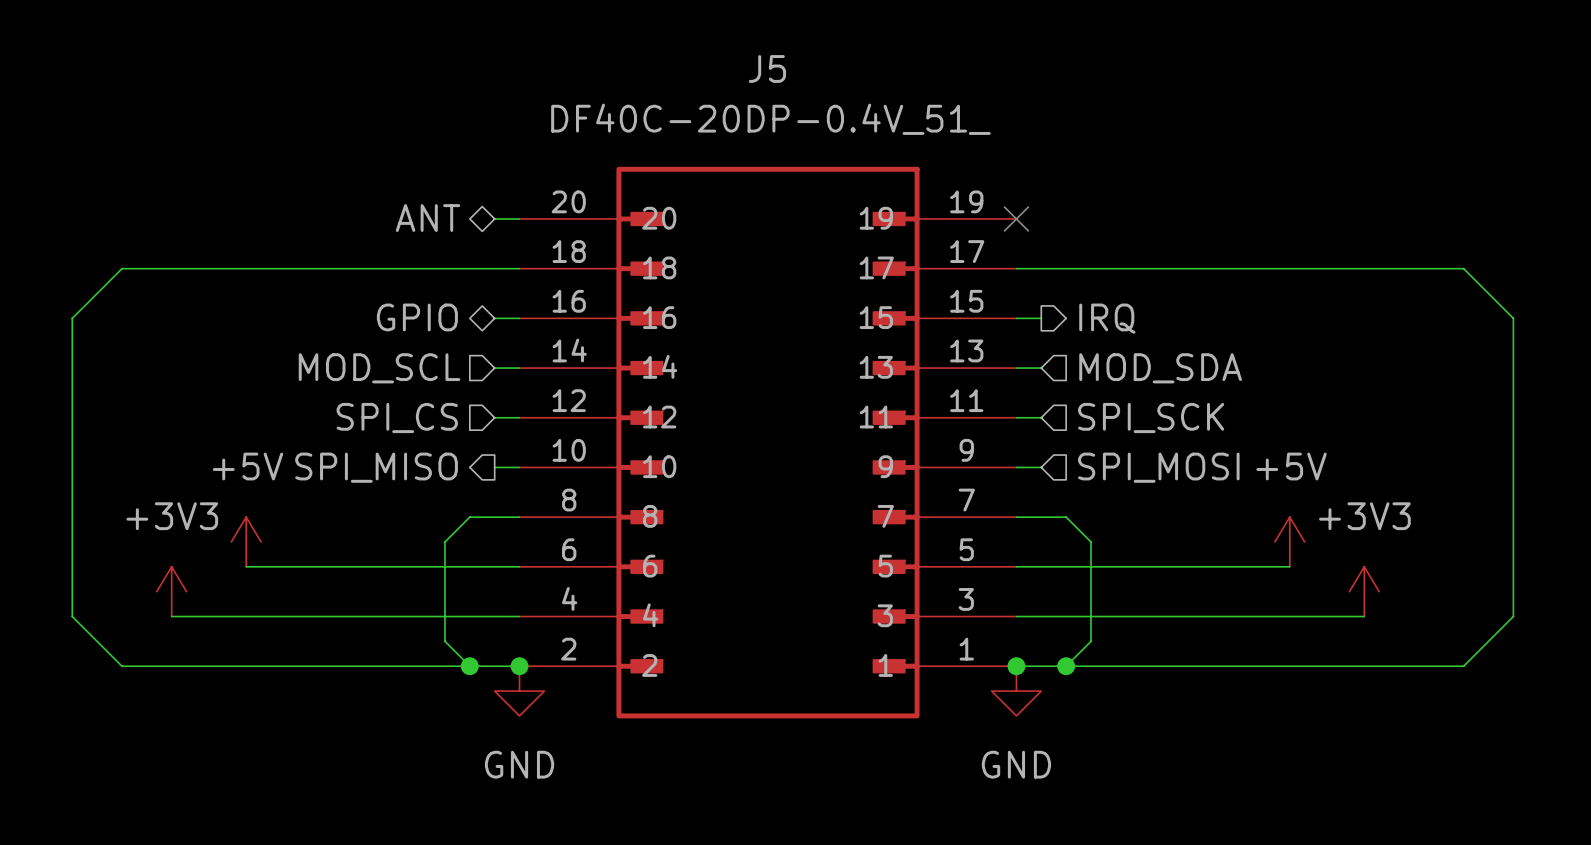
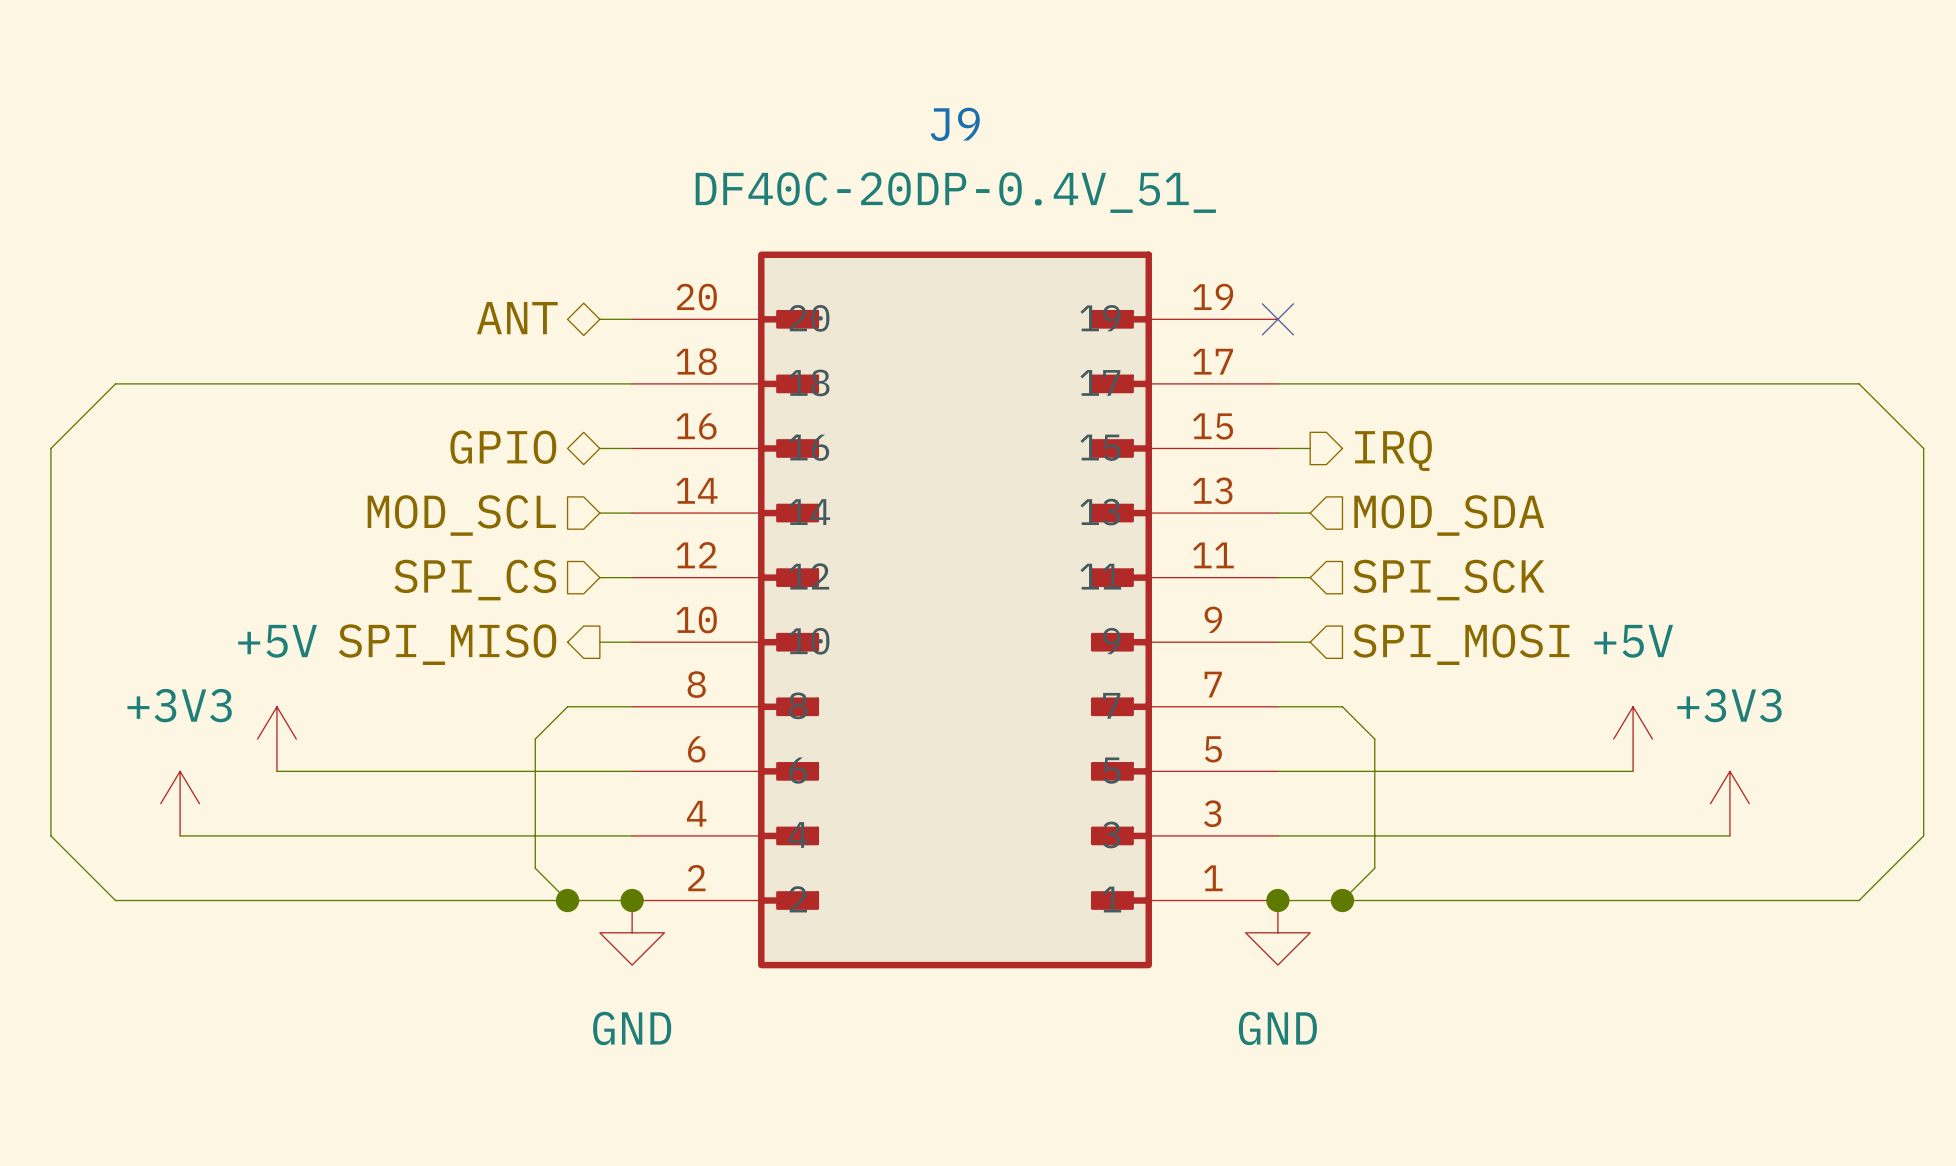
J5 name: J5 (767, 68) -> J9 (955, 124)

